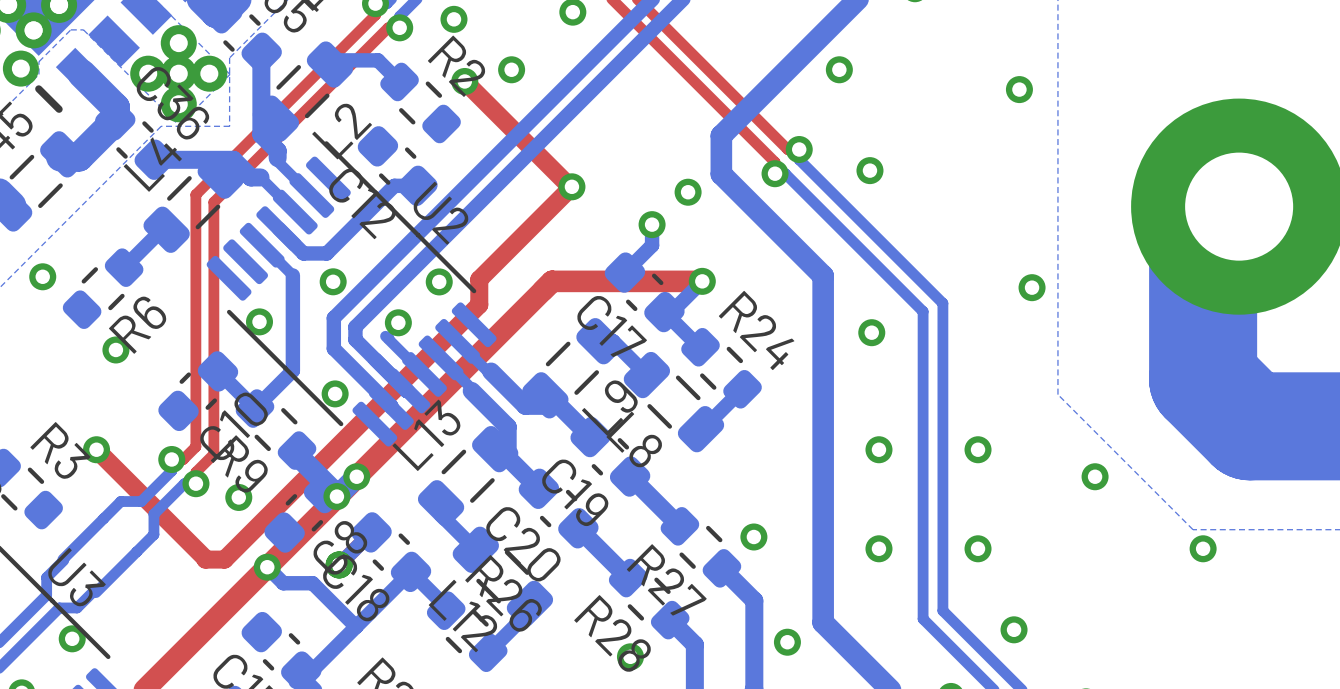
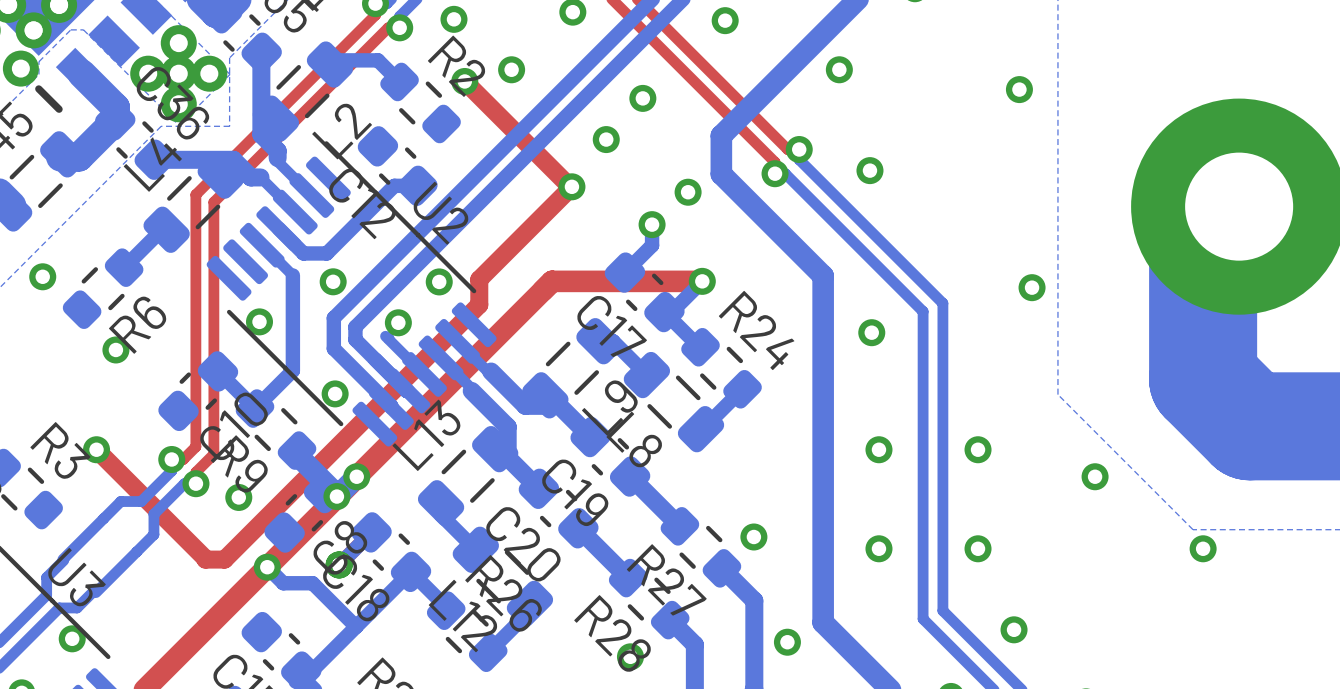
via: none -> (725, 20)
via: none -> (642, 98)
via: none -> (606, 139)

